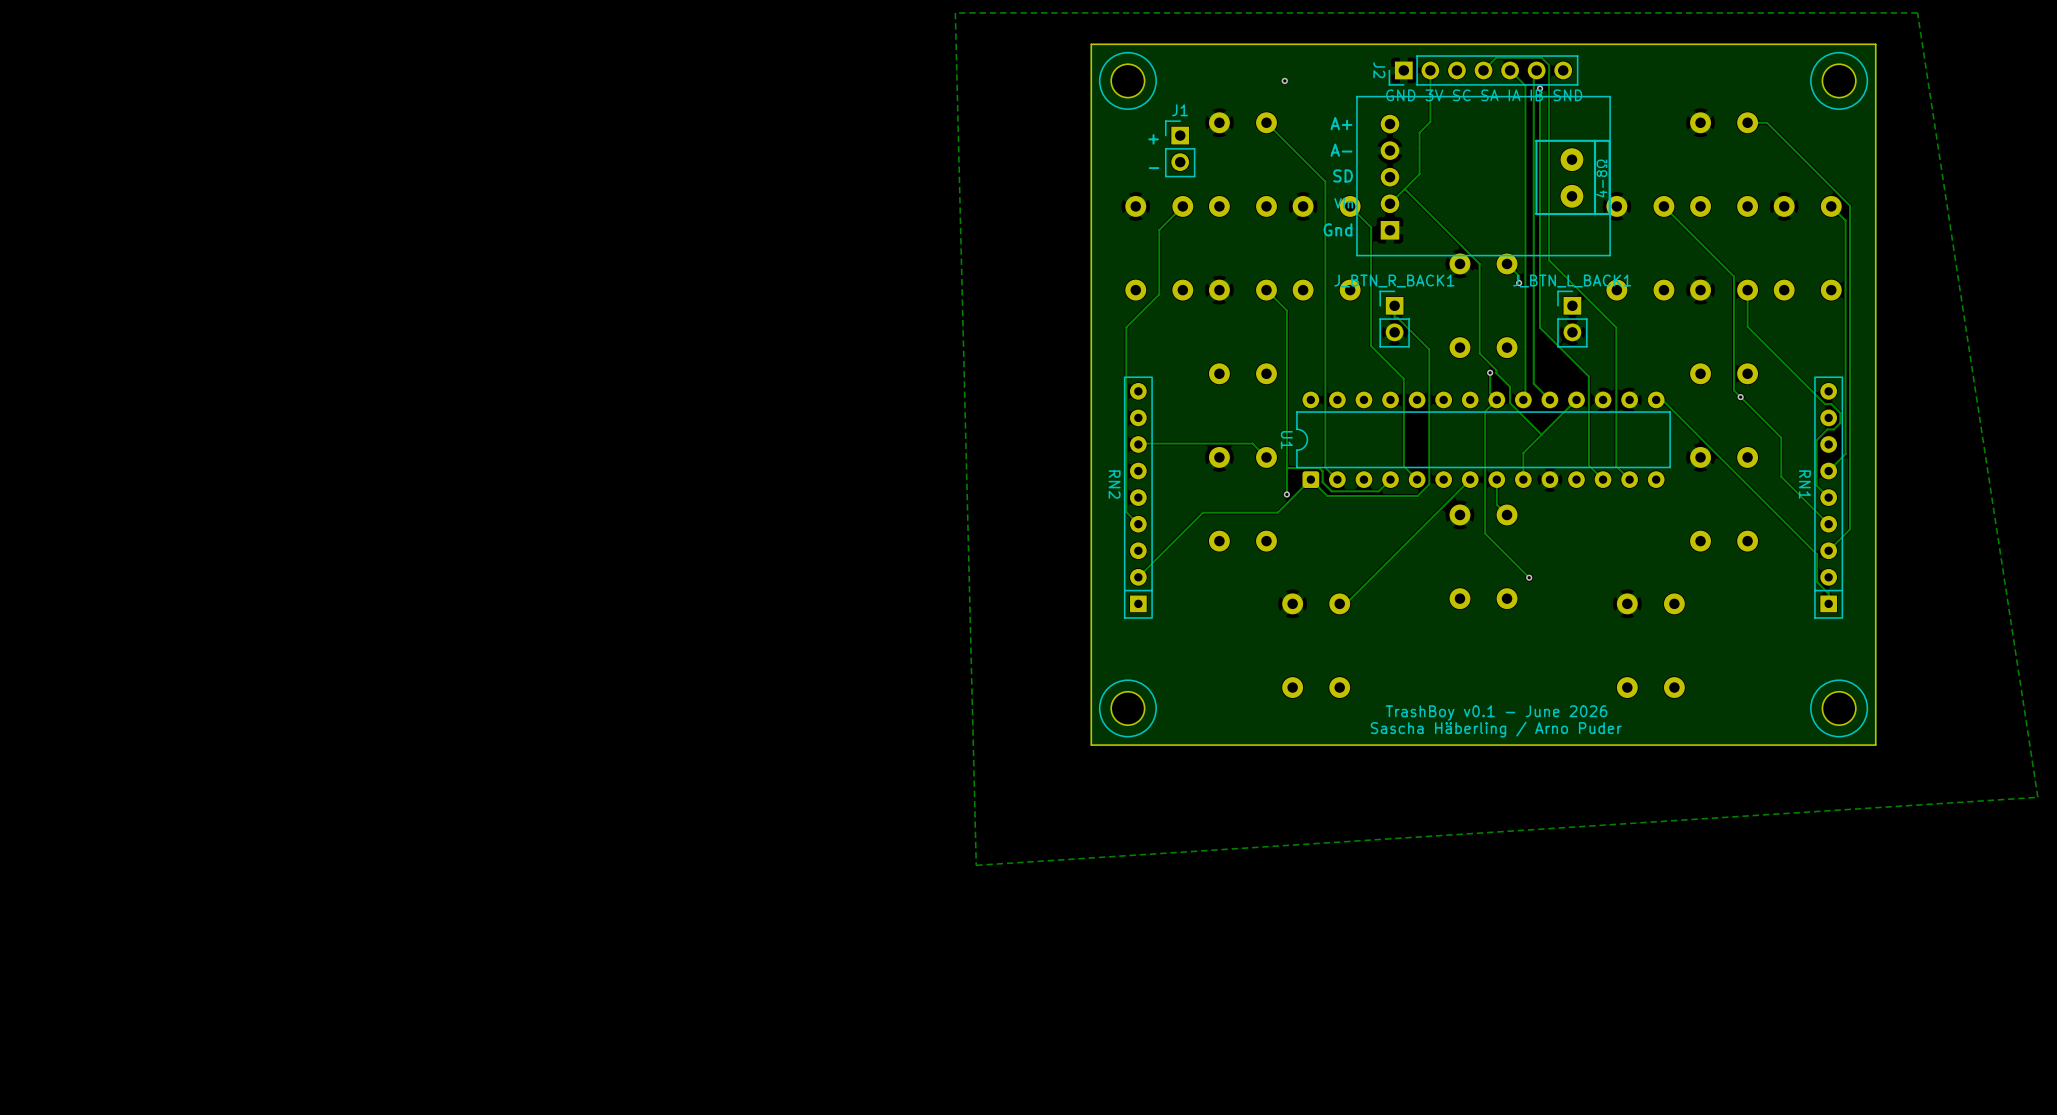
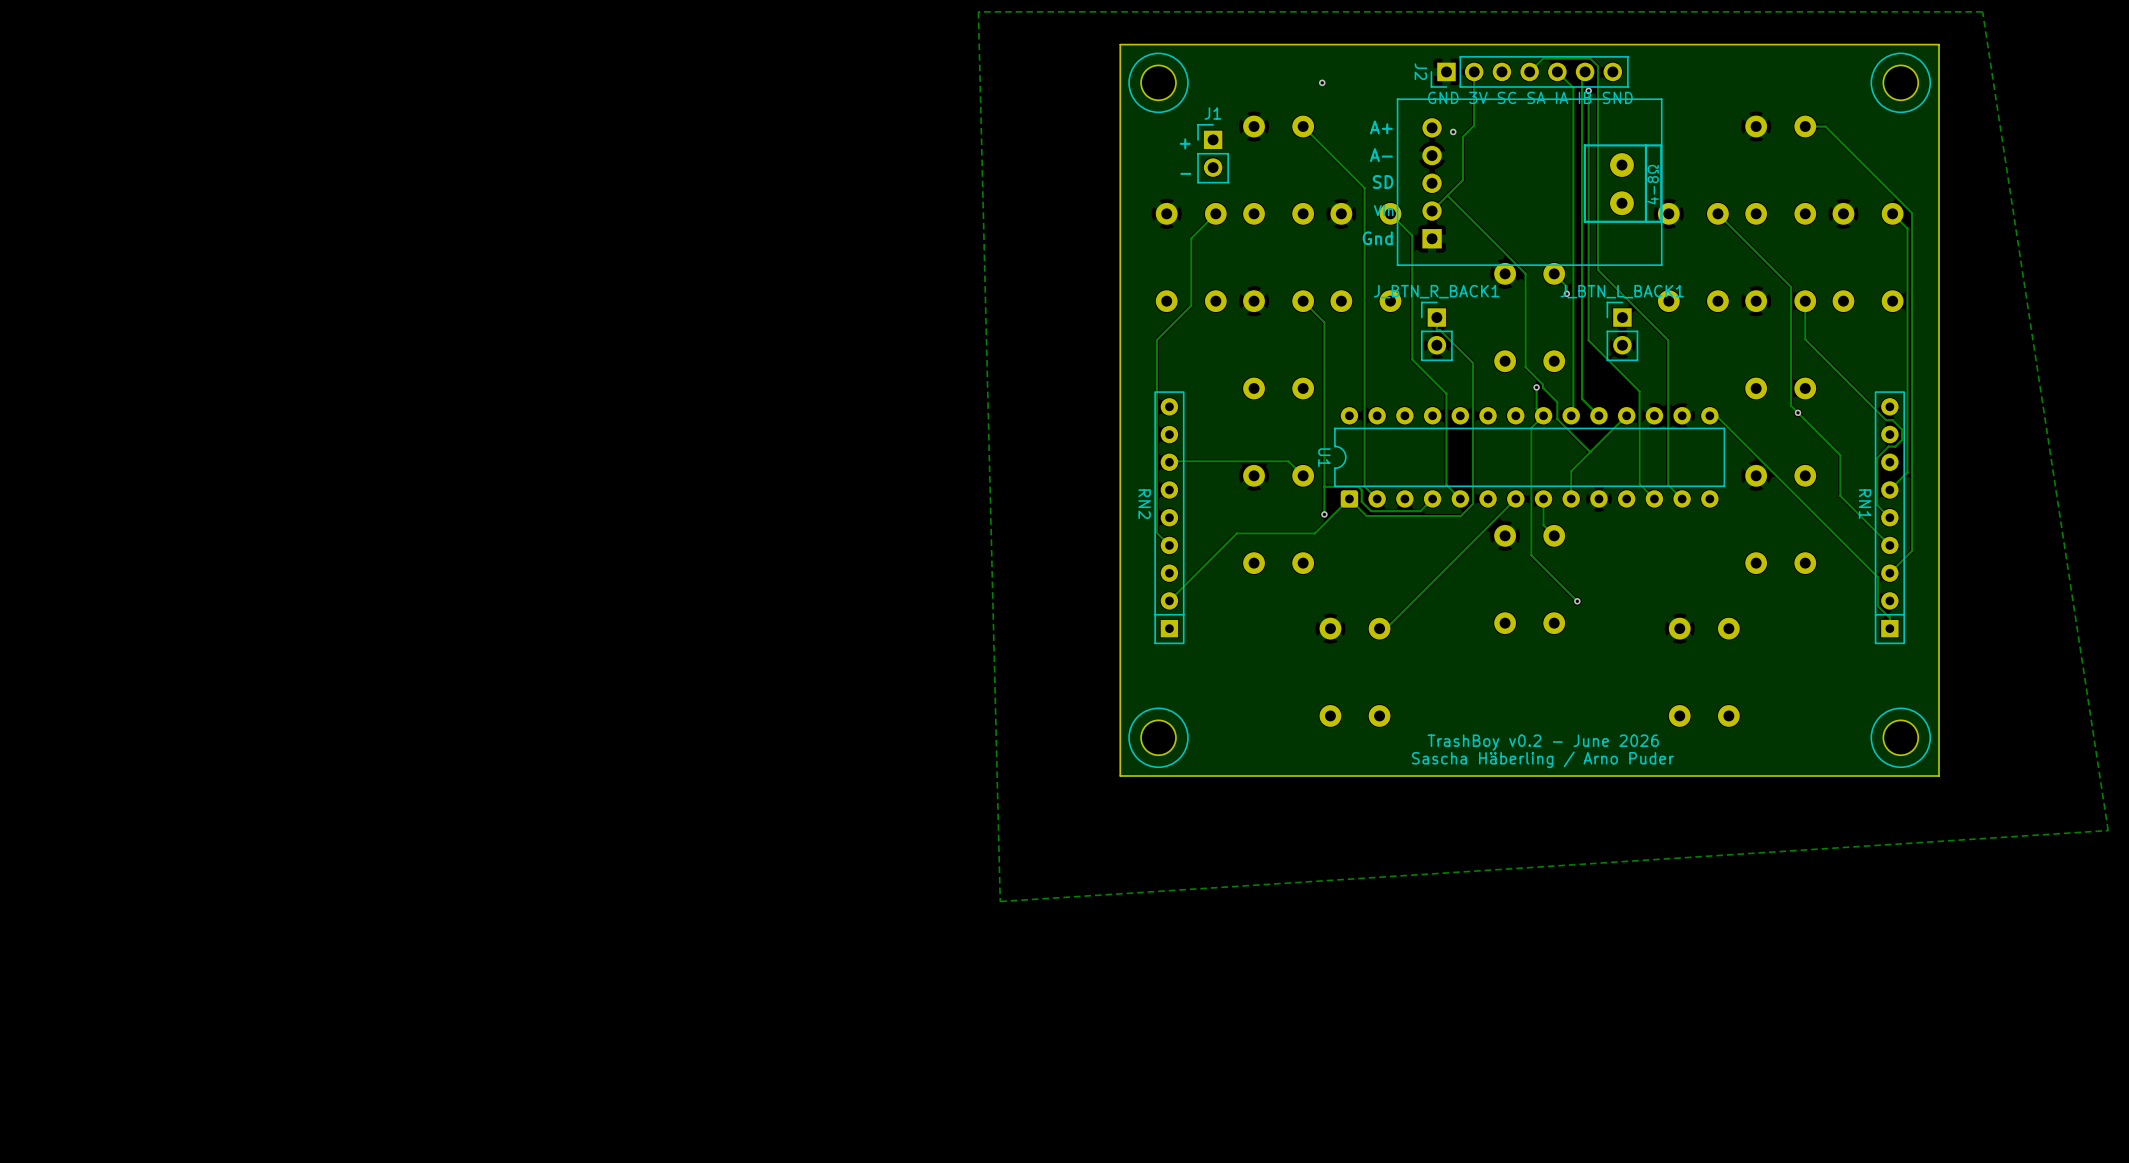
via: none -> (1453, 131)
text: TrashBoy v0.1 - June 2026 (1496, 713) -> TrashBoy v0.2 - June 2026 (1543, 742)

